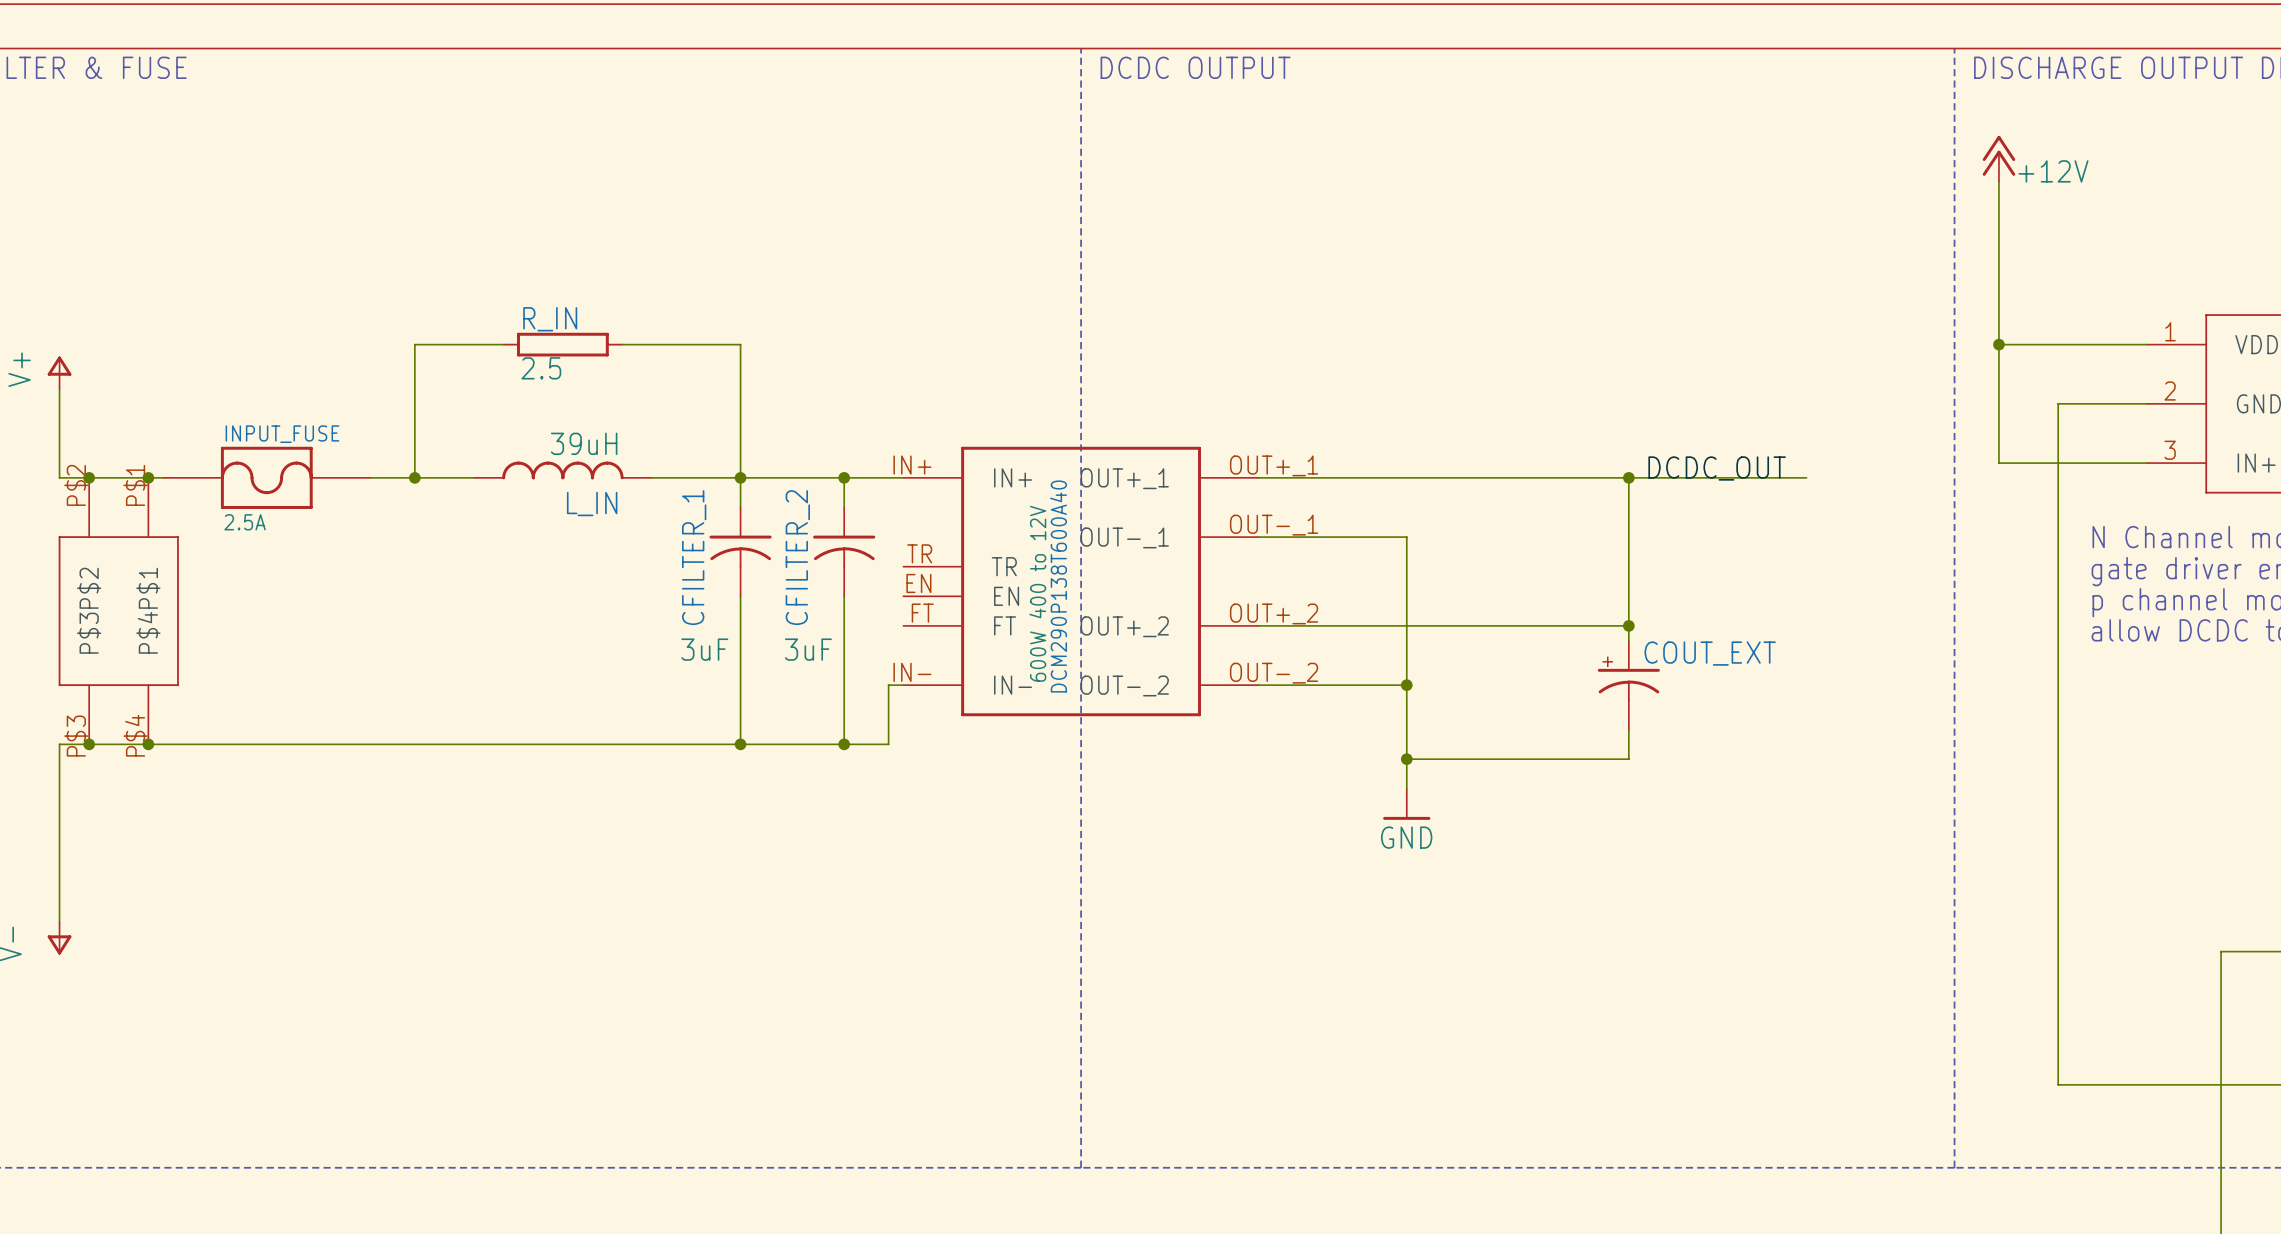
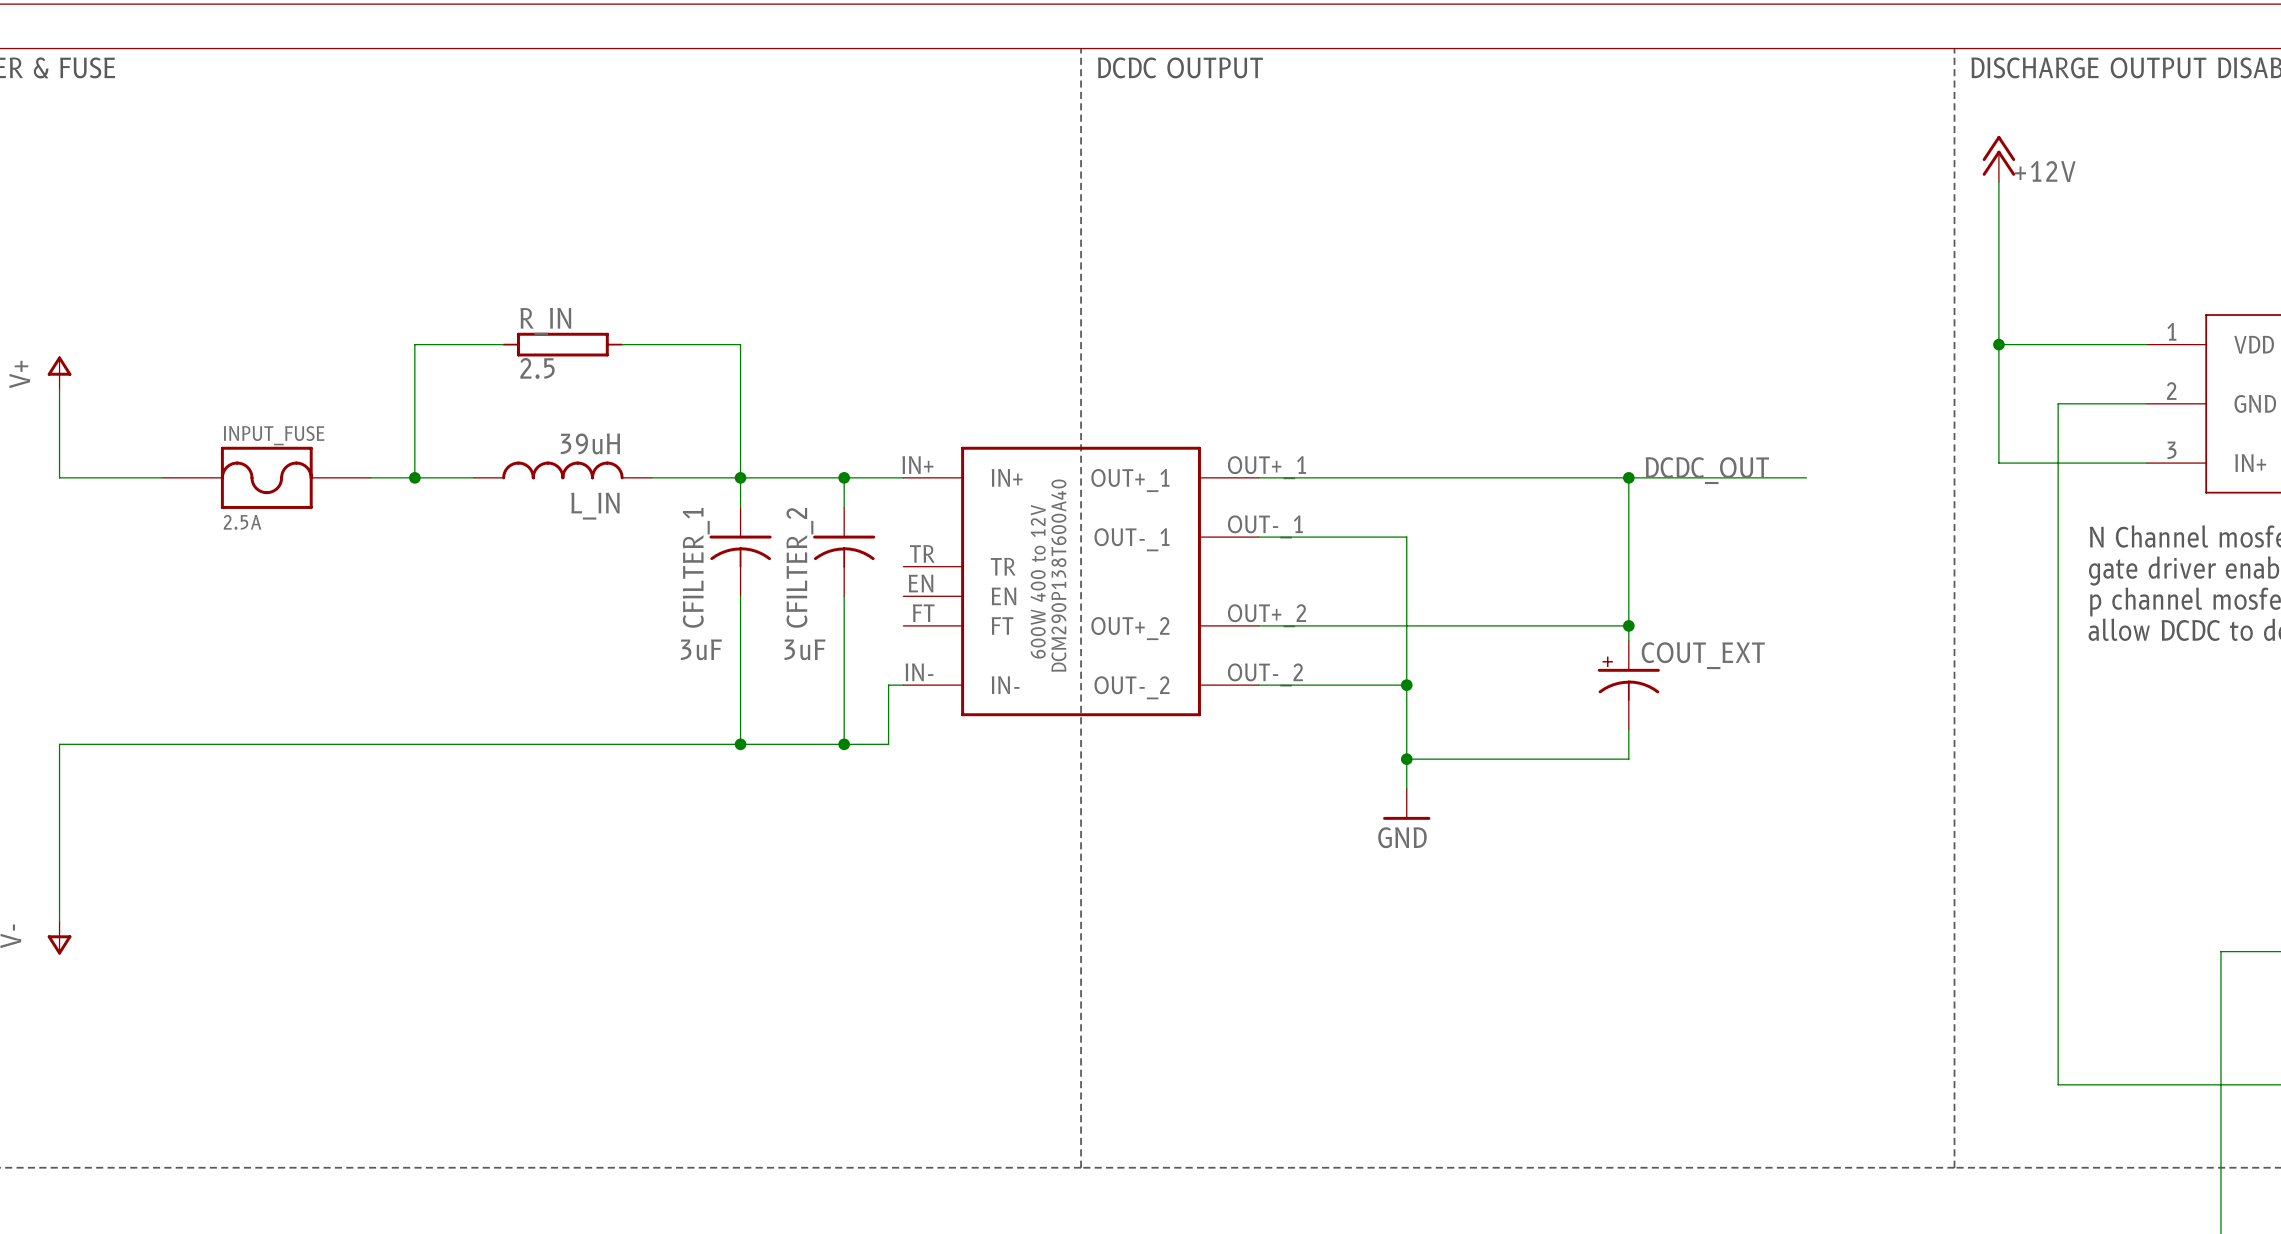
junction: (89, 477) -> none
junction: (148, 477) -> none
part: (118, 611) -> none
junction: (89, 744) -> none
junction: (148, 744) -> none

